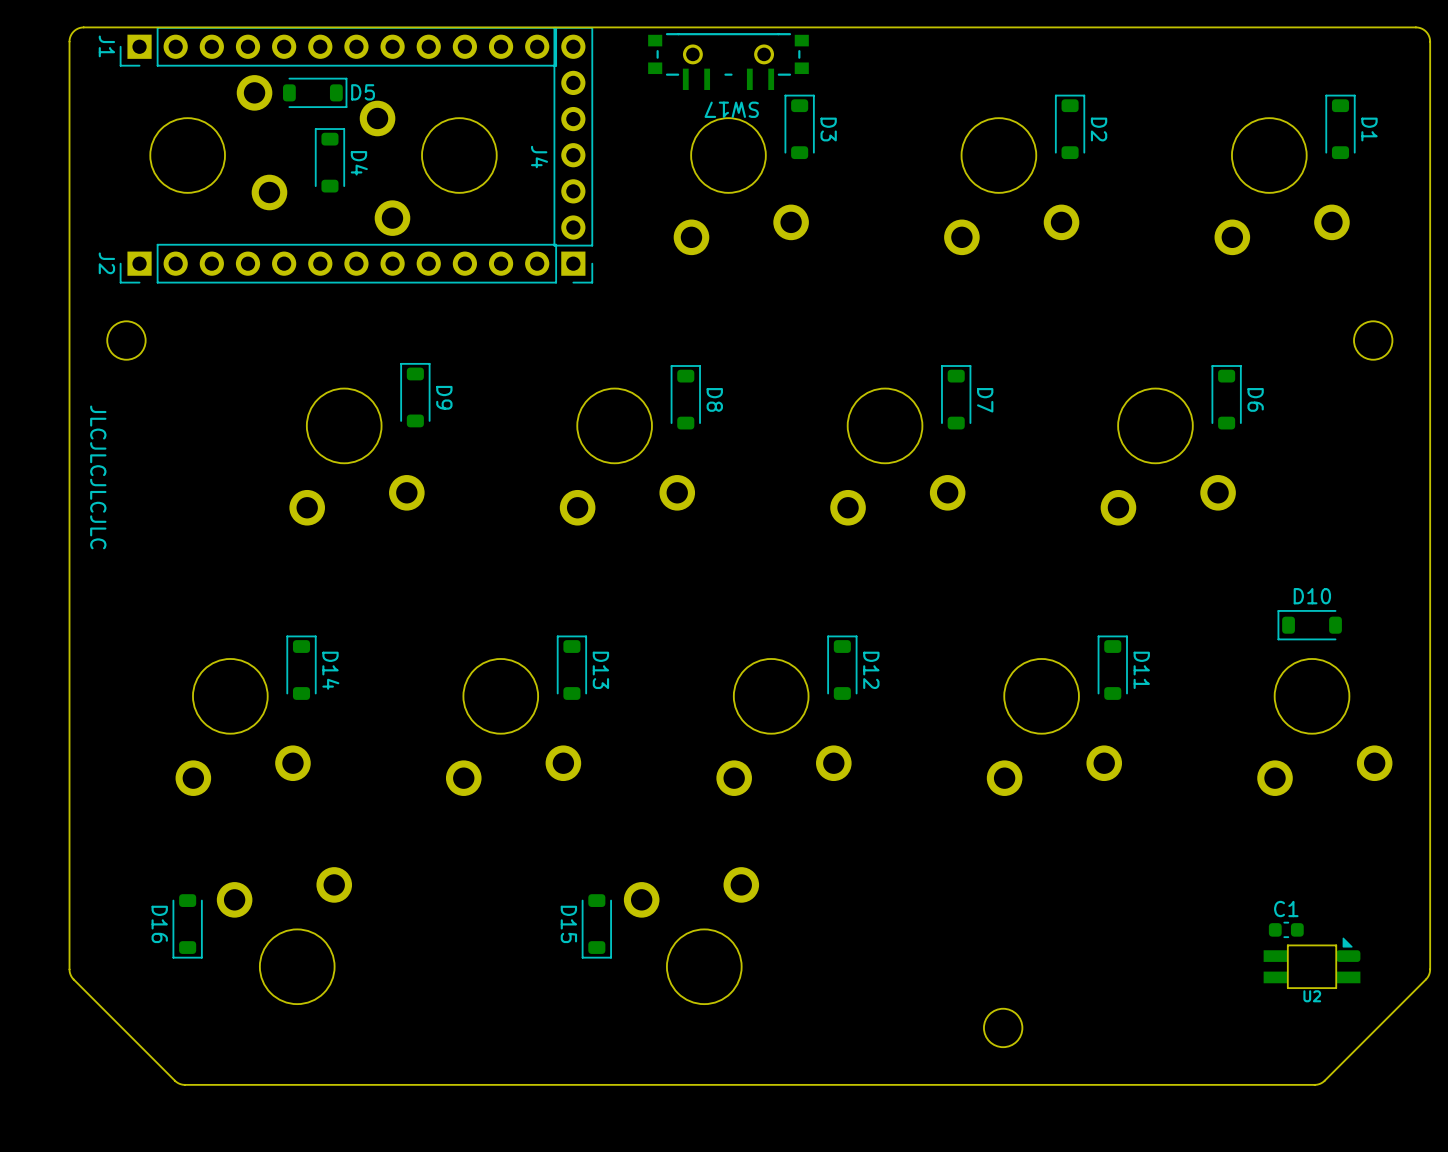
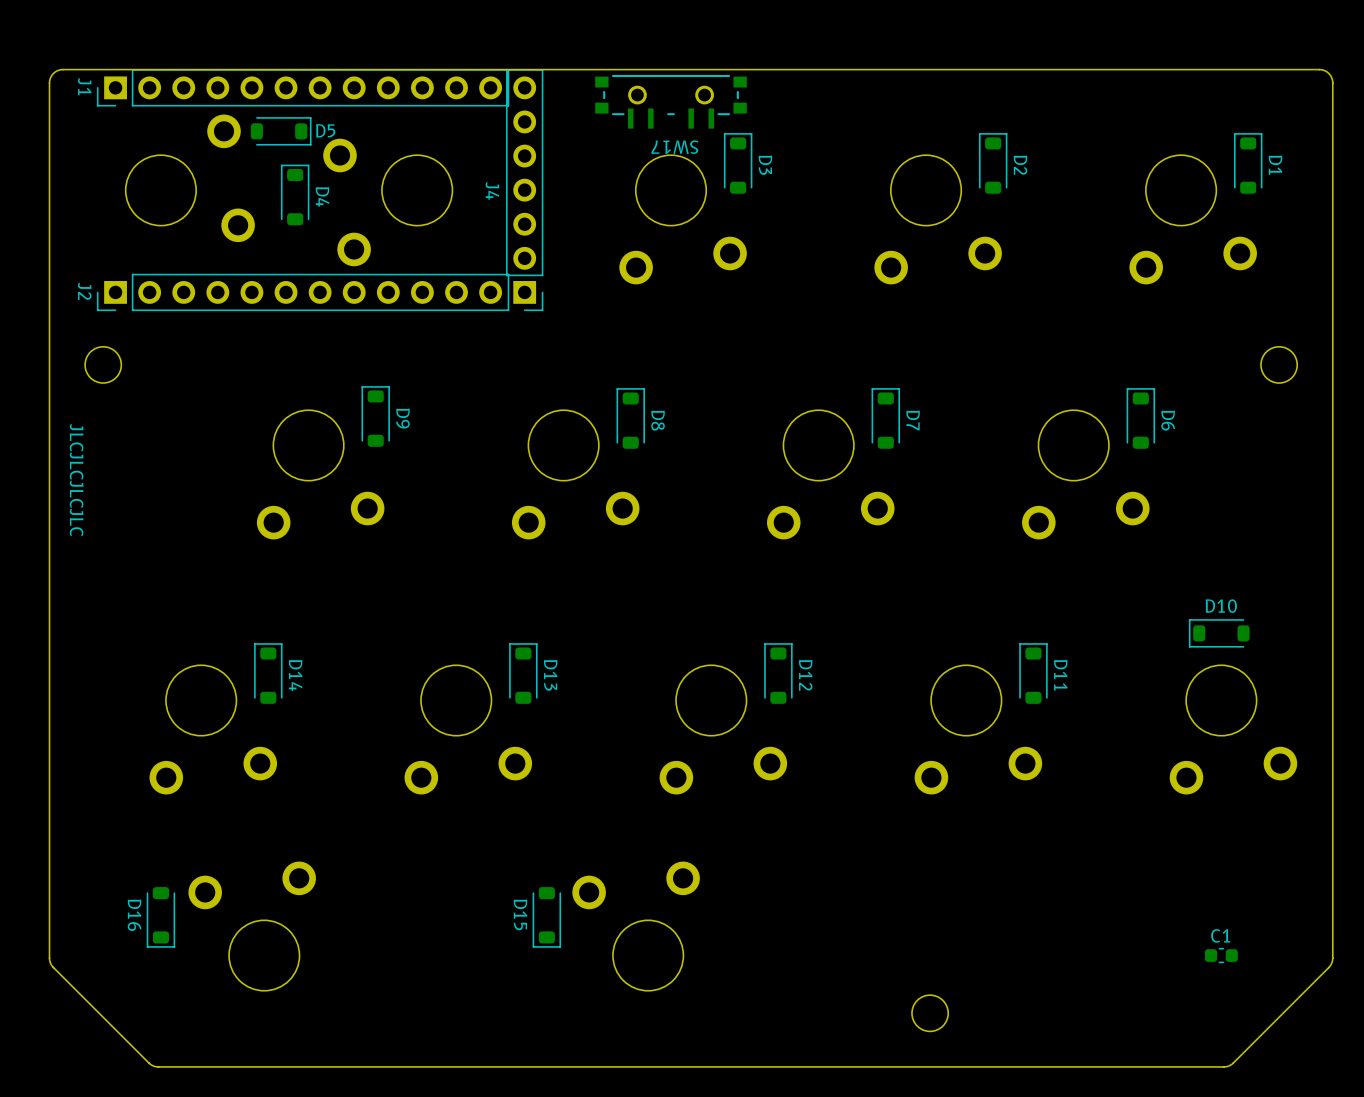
C1 position: (1286, 929) -> (1221, 955)
U2: (1312, 963) -> none

